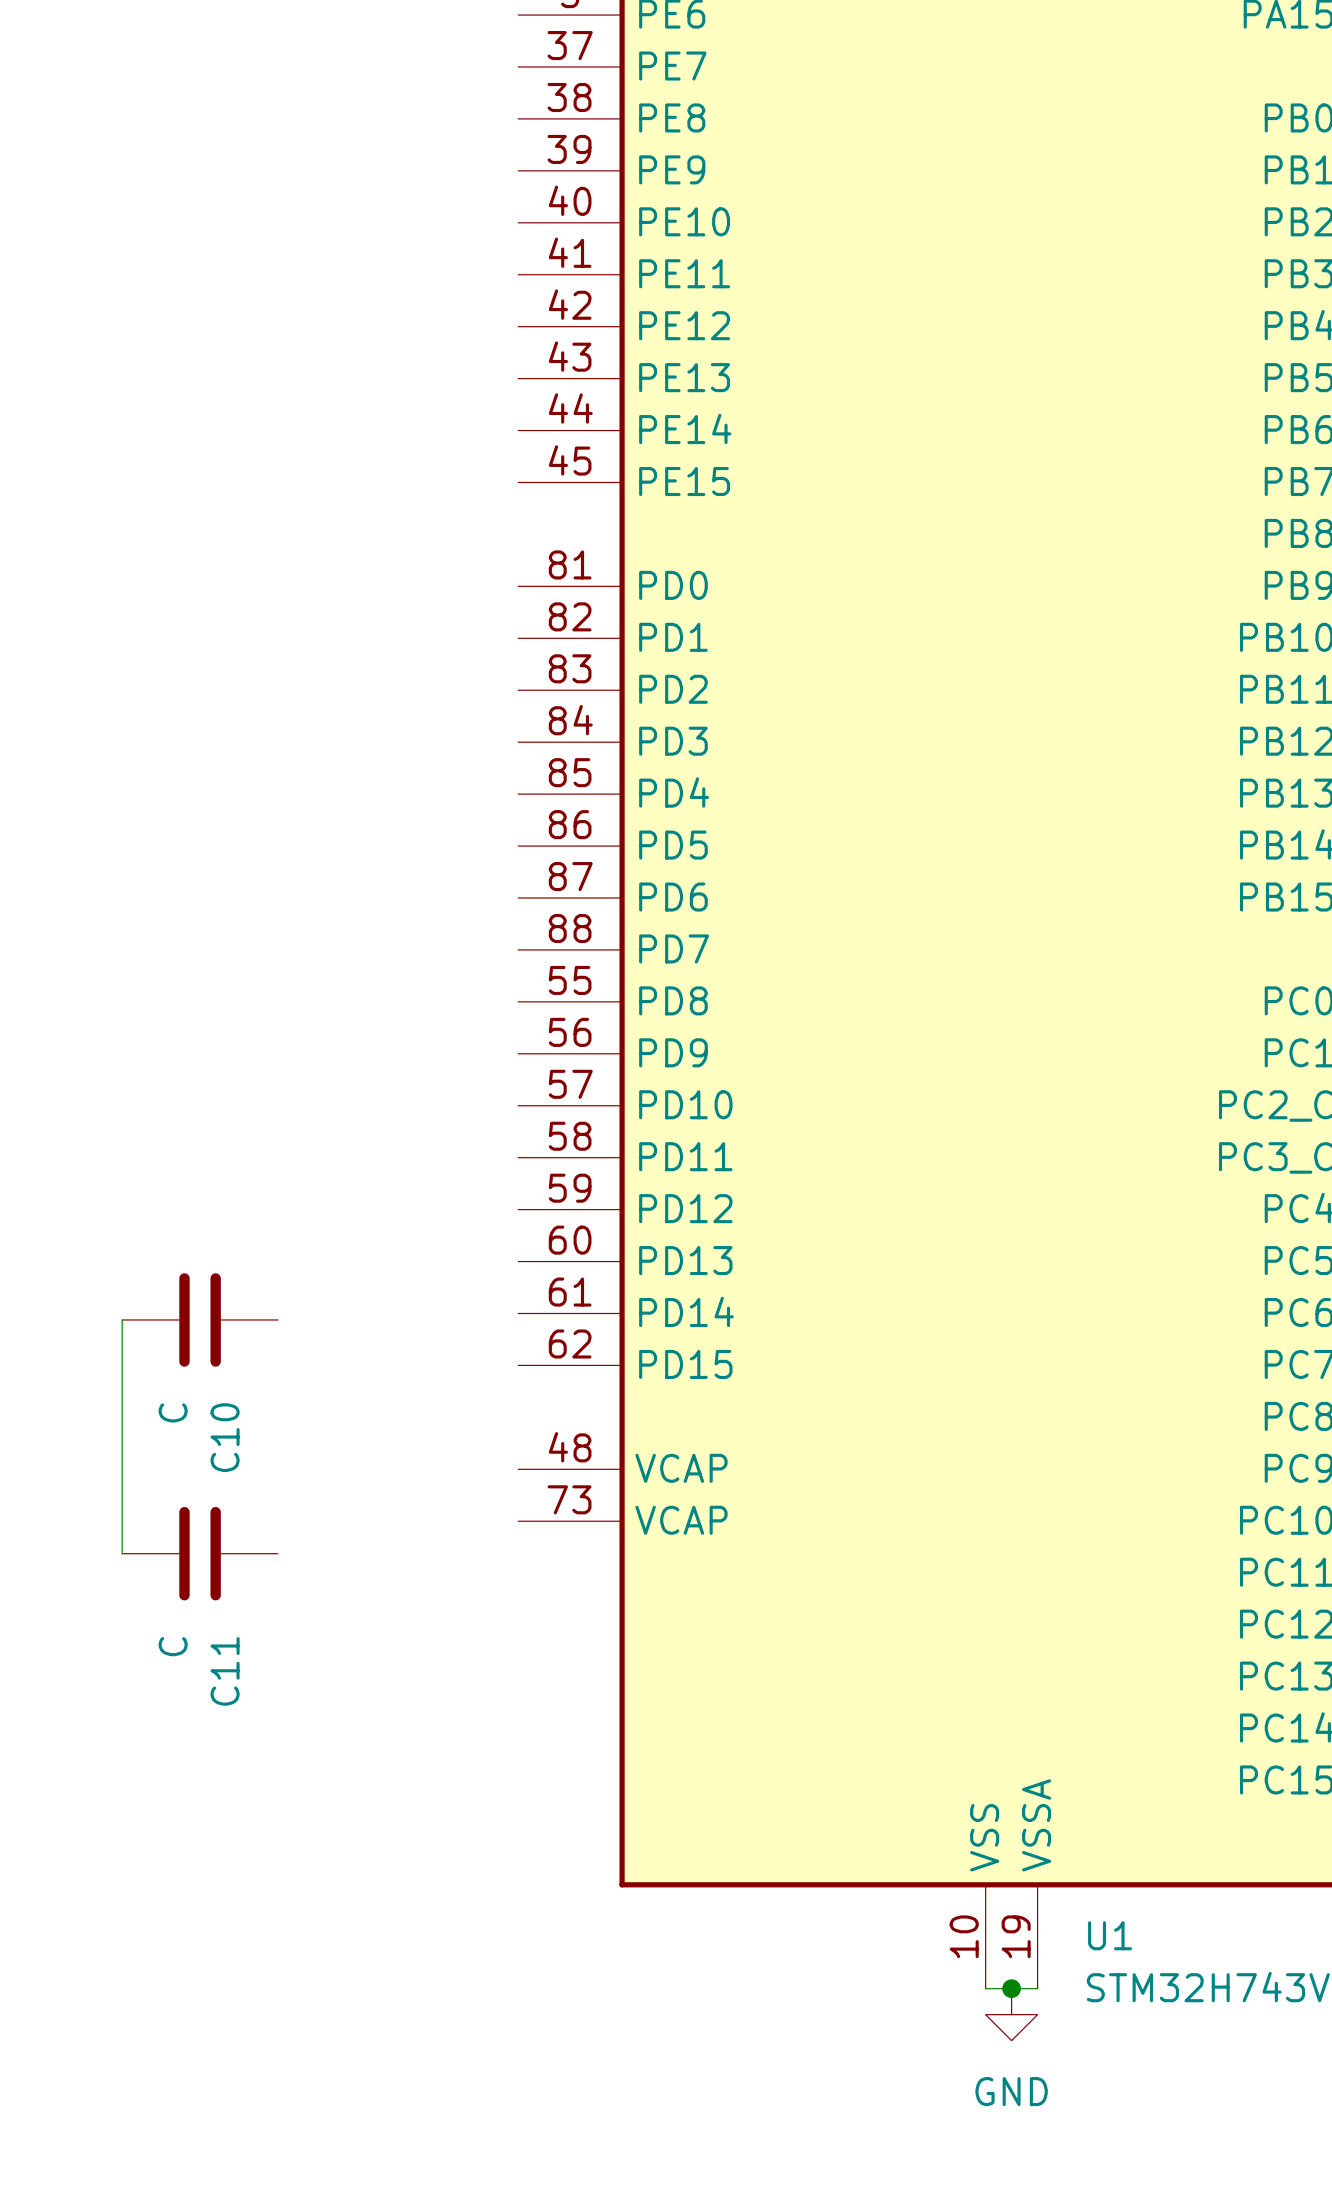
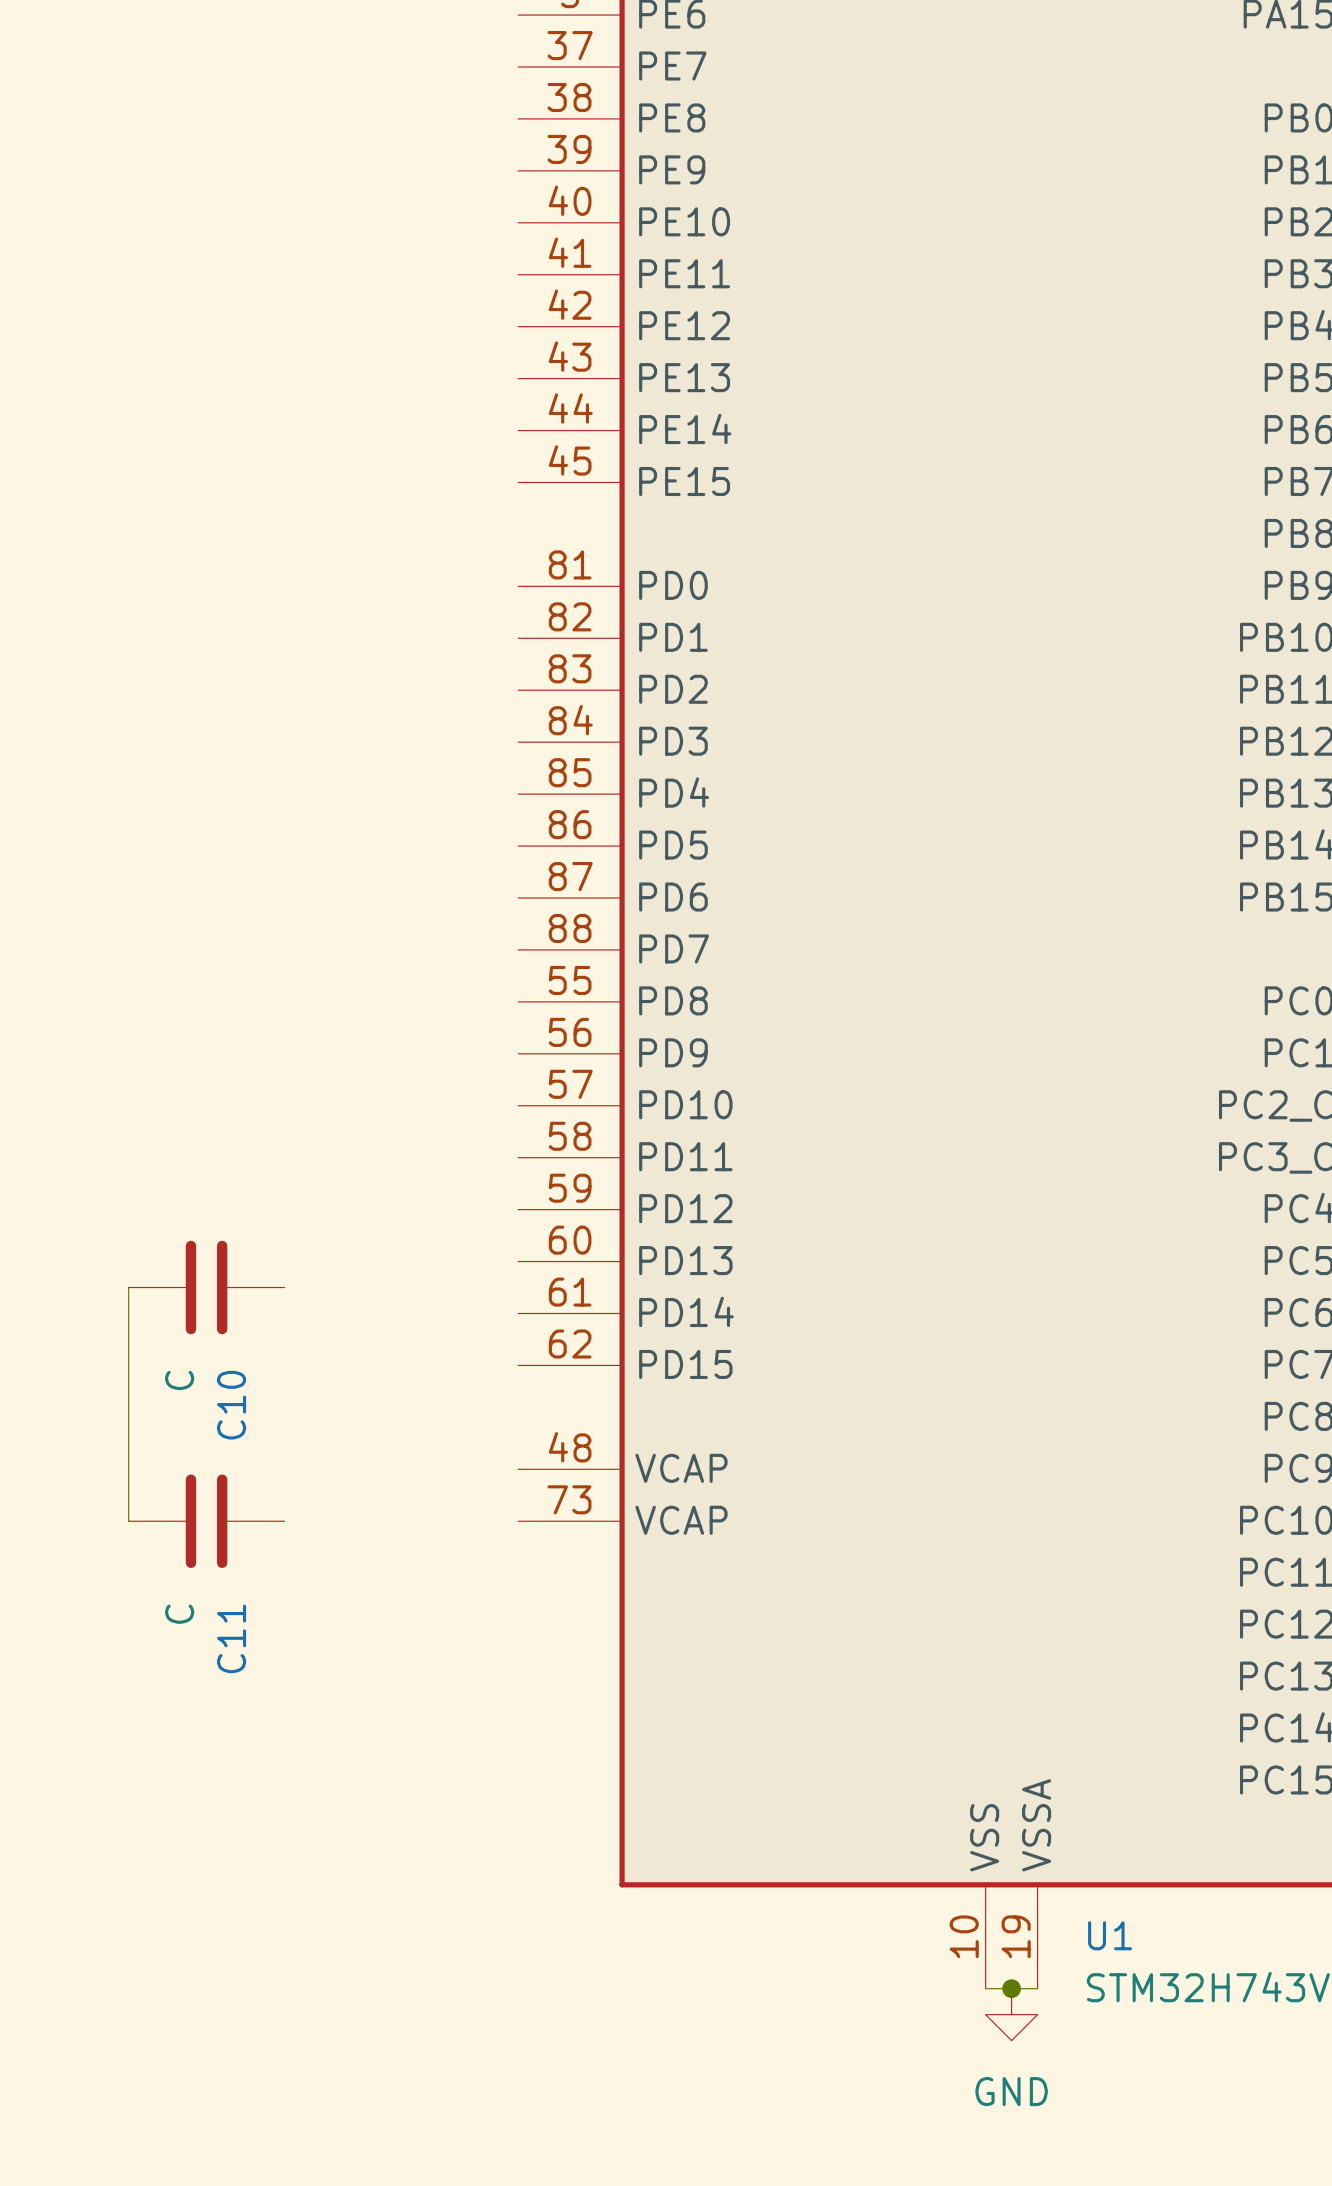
wire: (122, 1319) (122, 1553) -> (128, 1287) (128, 1521)
C10 position: (200, 1319) -> (206, 1287)
C11 position: (200, 1553) -> (206, 1521)

